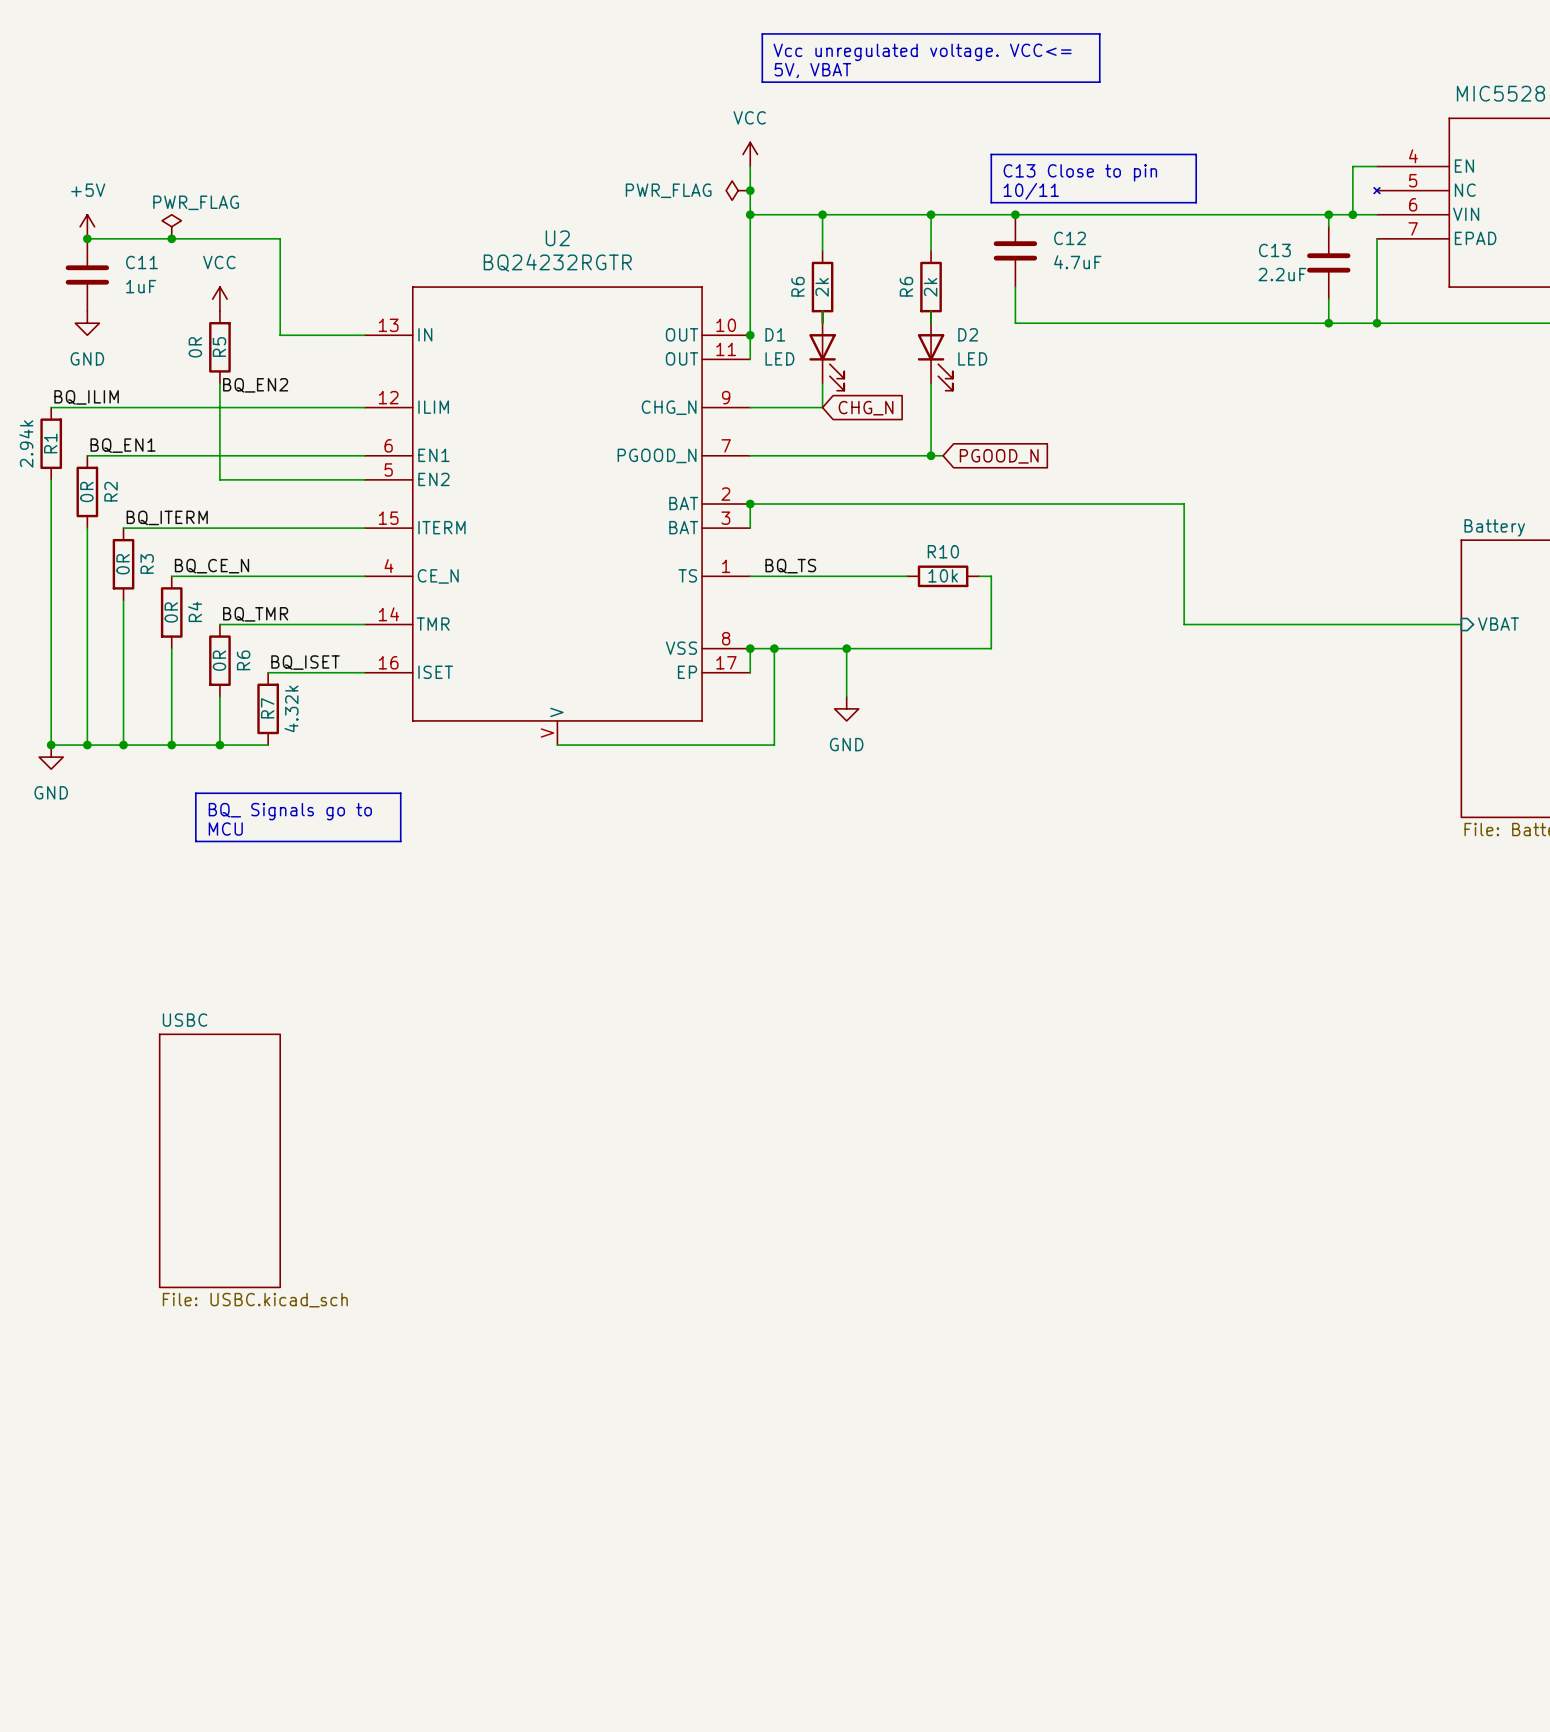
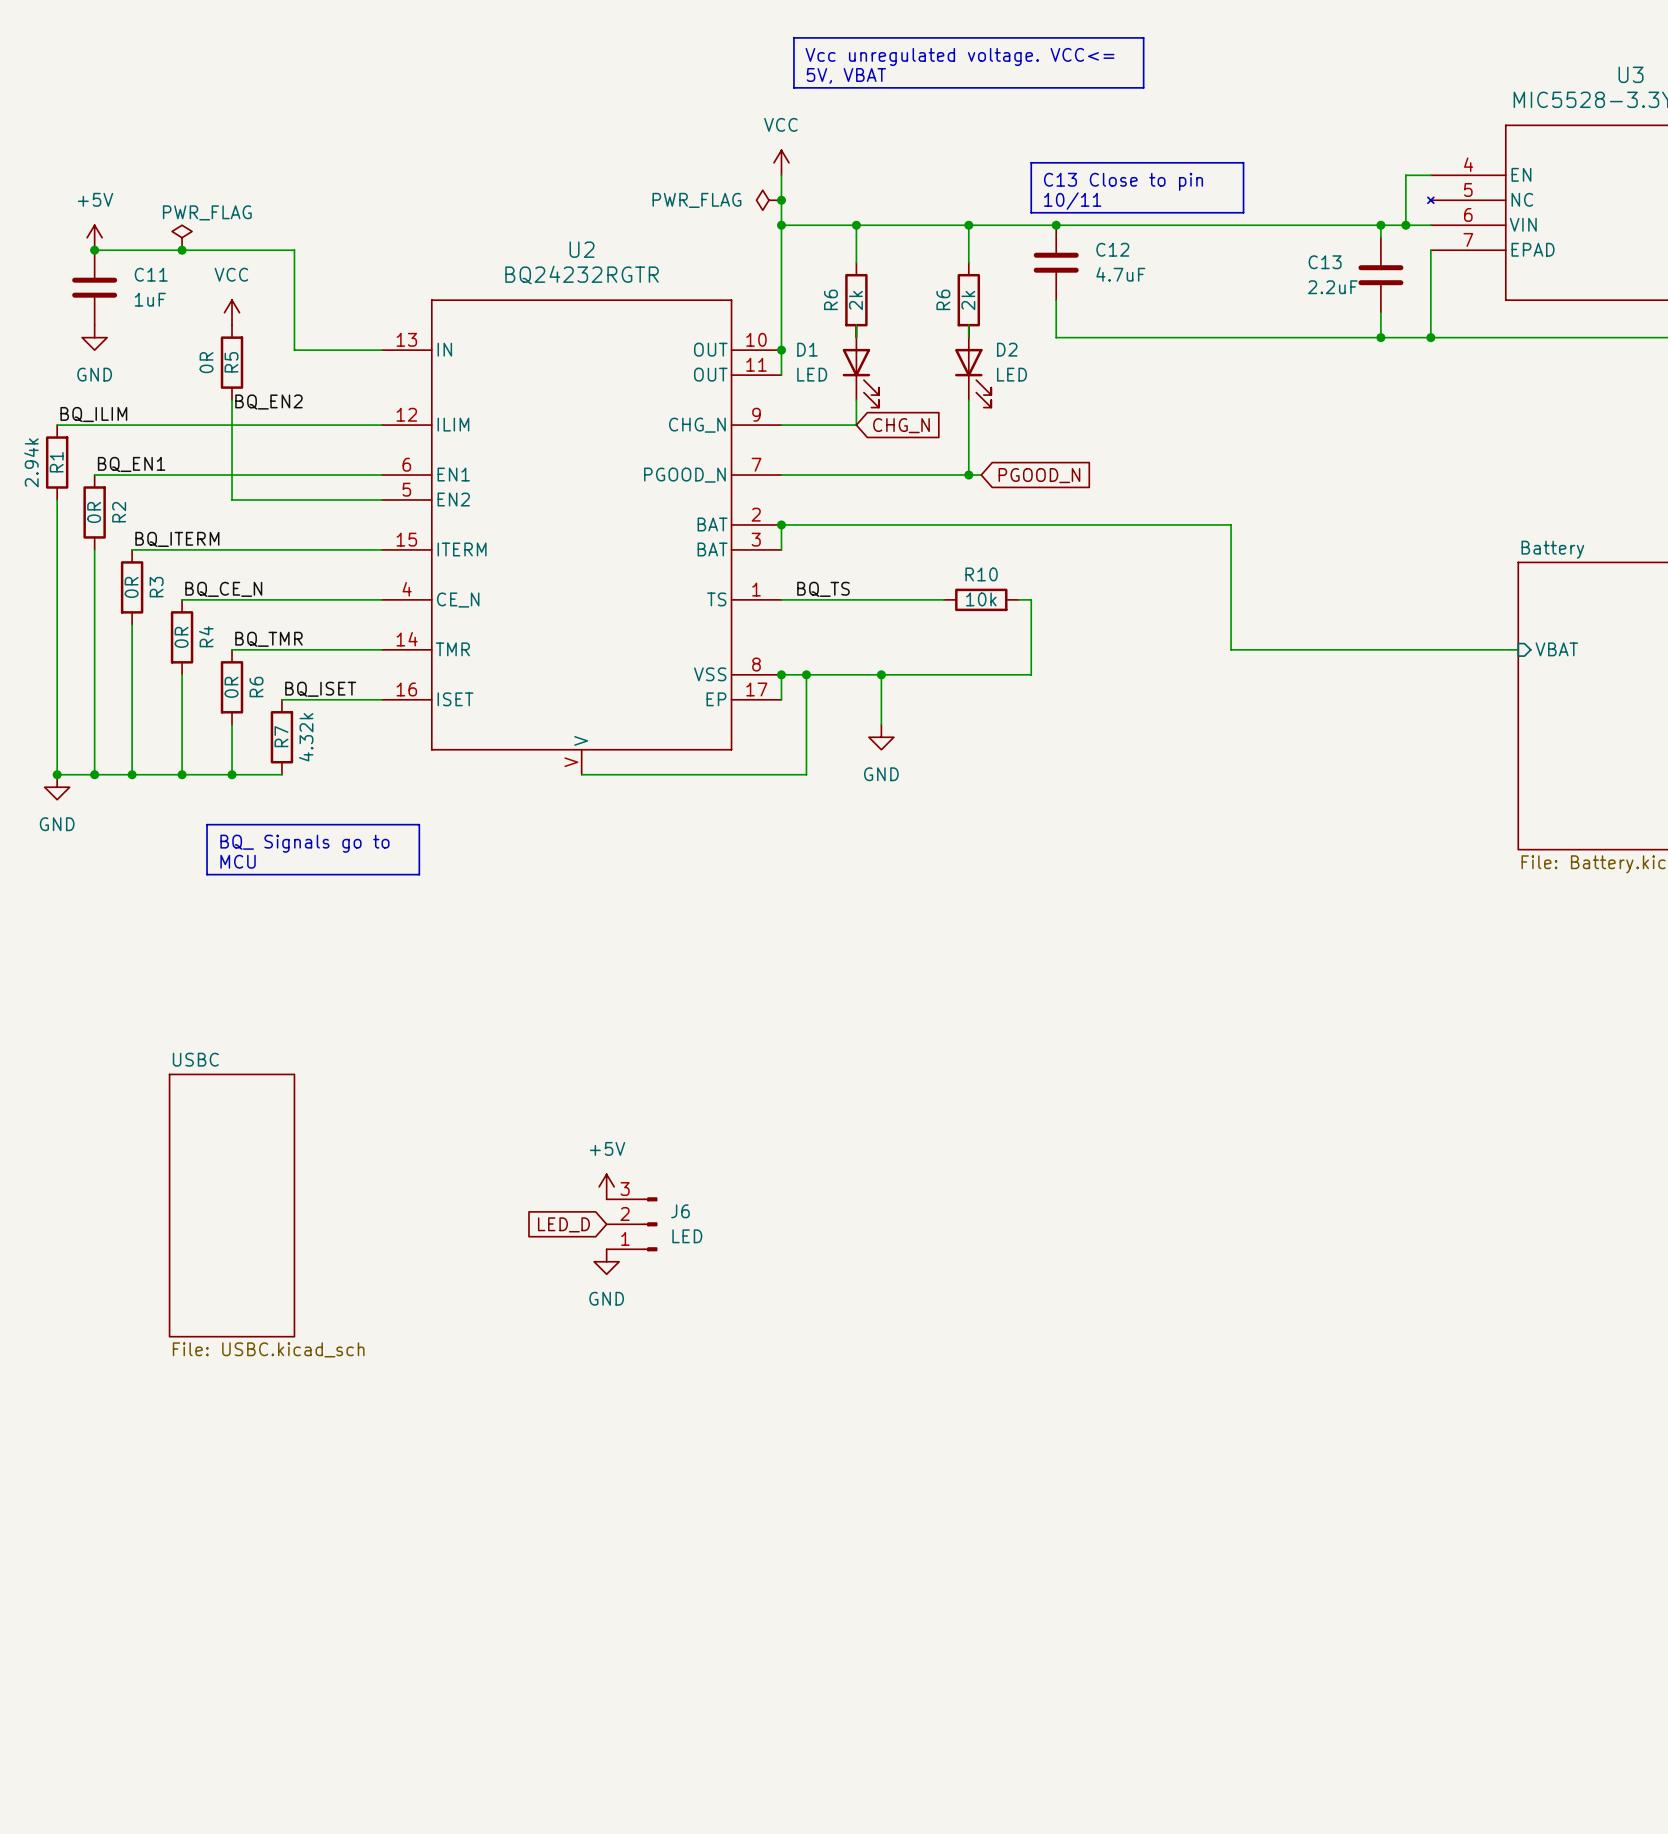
power symbol: none -> +5V (606, 1186)
J6: none -> LED (632, 1224)
global label: none -> LED_D (563, 1224)
power symbol: none -> GND (606, 1261)

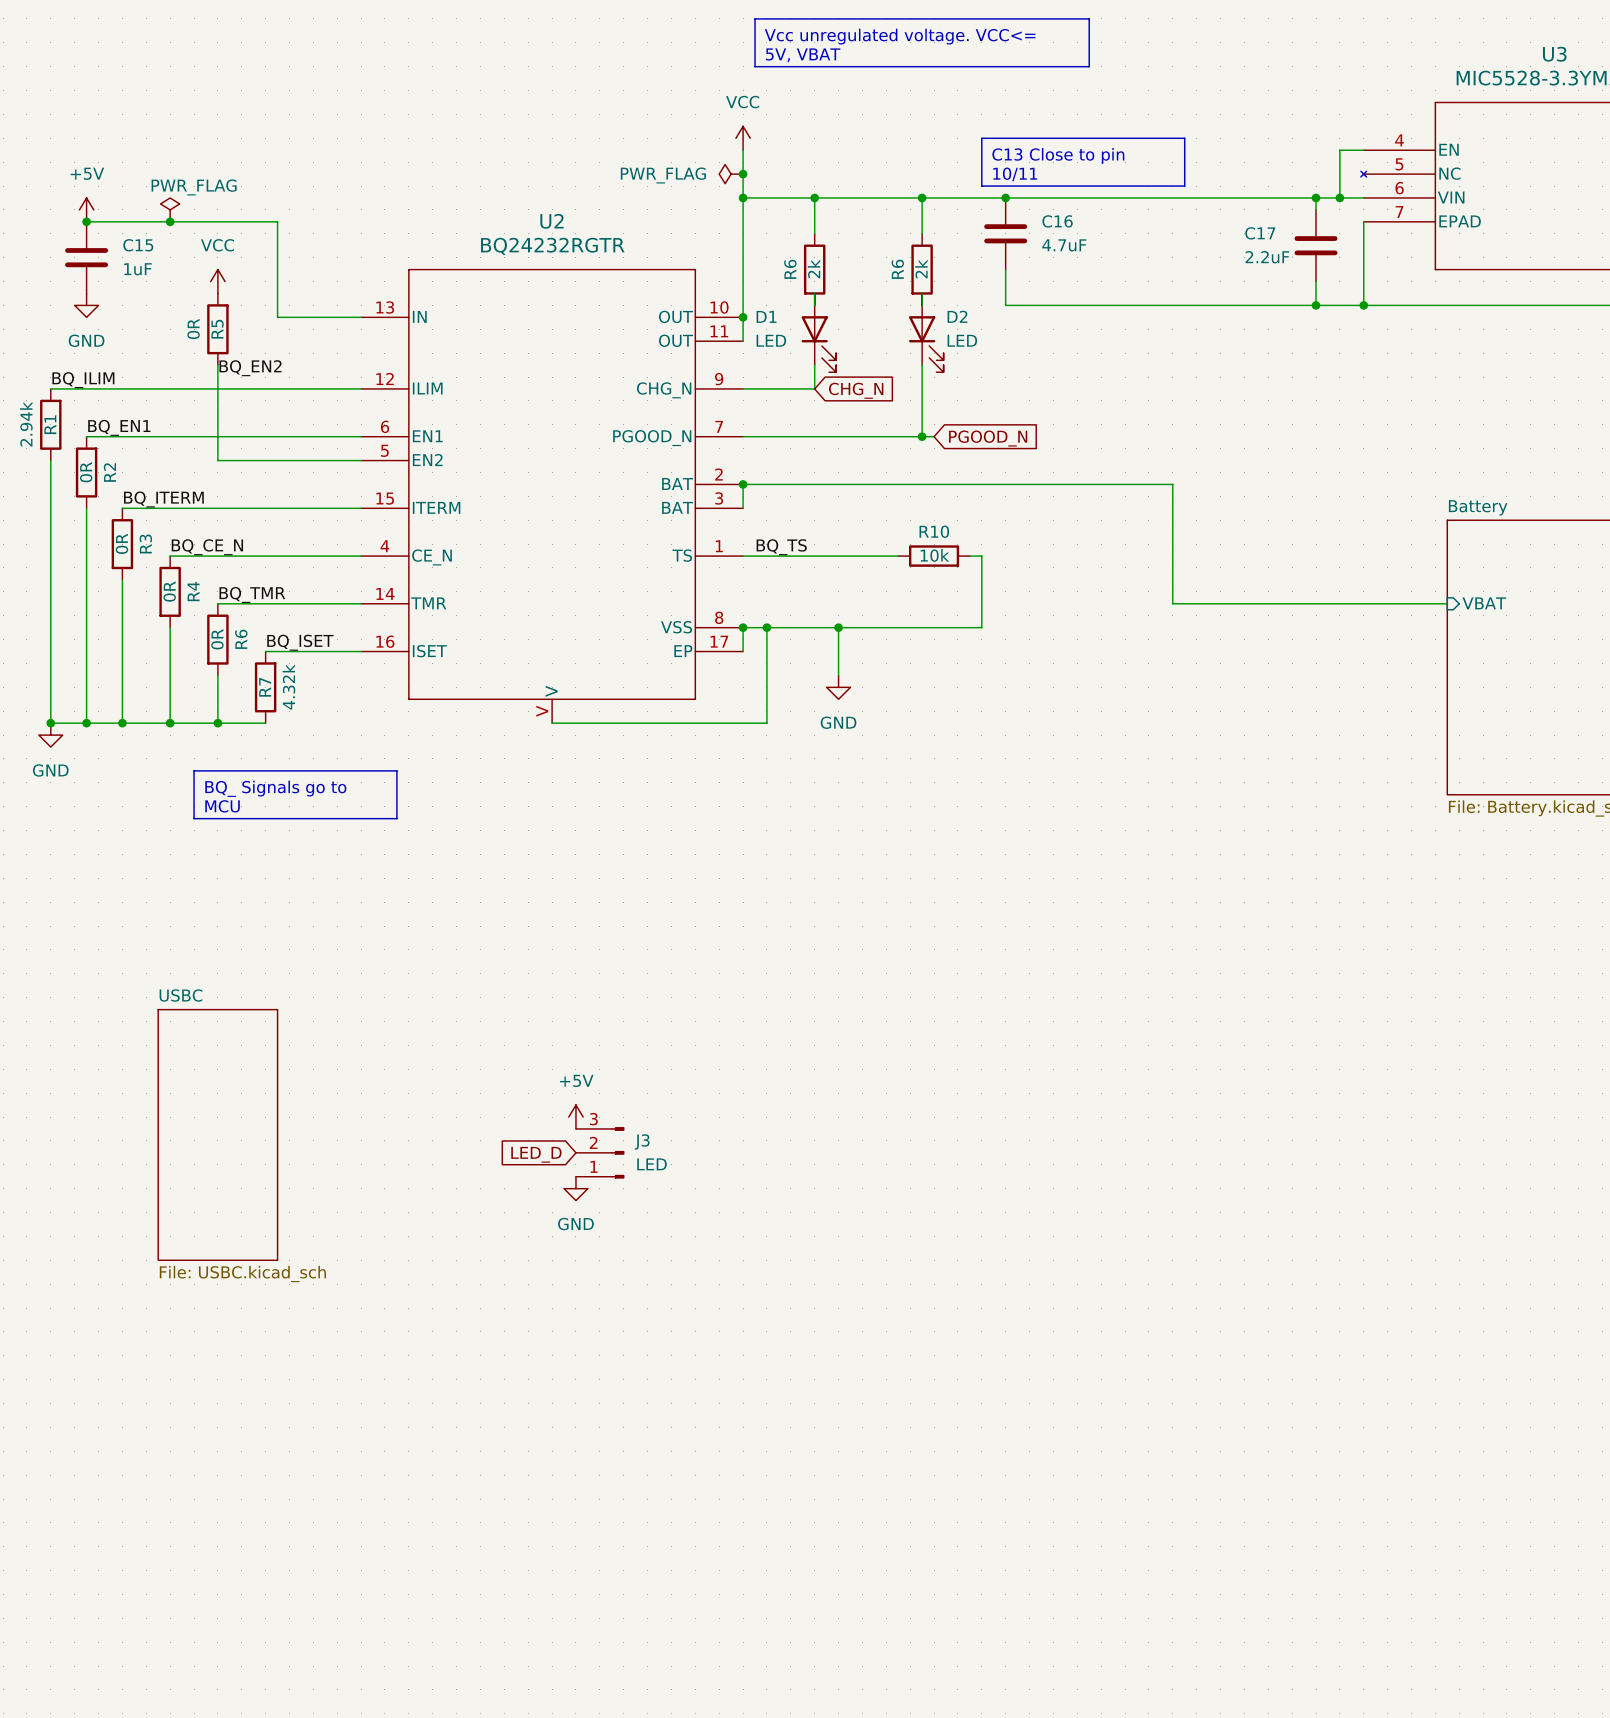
C12 name: C12 (1112, 249) -> C16 (1057, 221)
C13 name: C13 (1325, 262) -> C17 (1260, 233)
C11 name: C11 (151, 274) -> C15 (138, 245)
J6 name: J6 (680, 1211) -> J3 (642, 1142)

